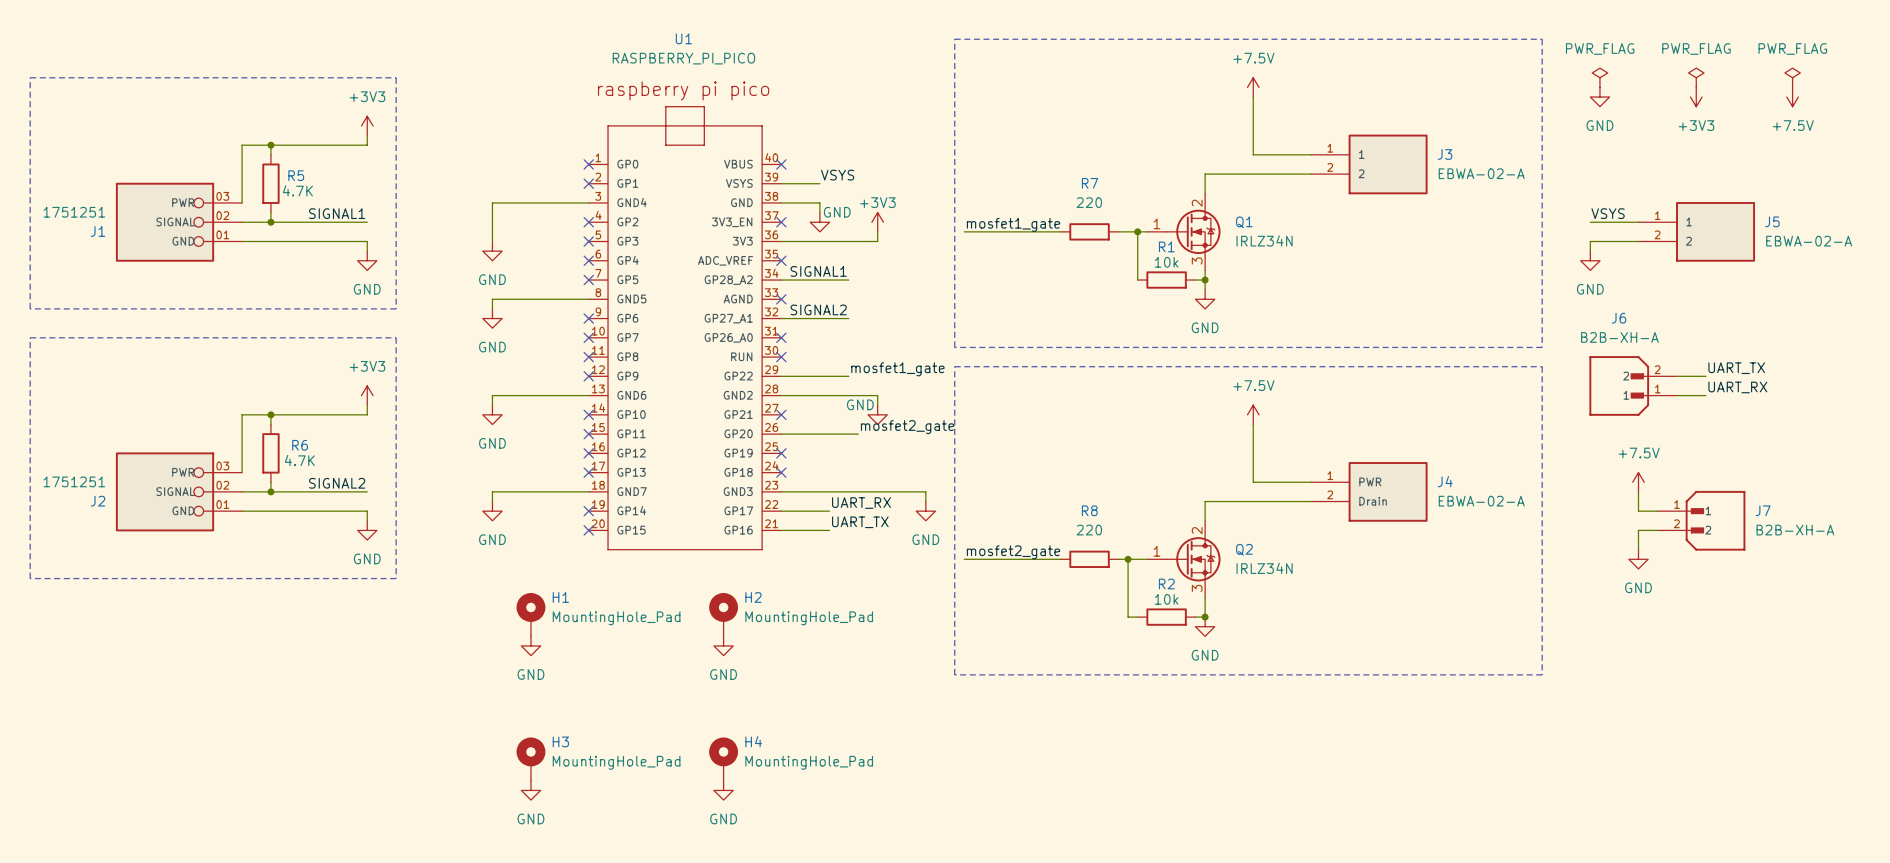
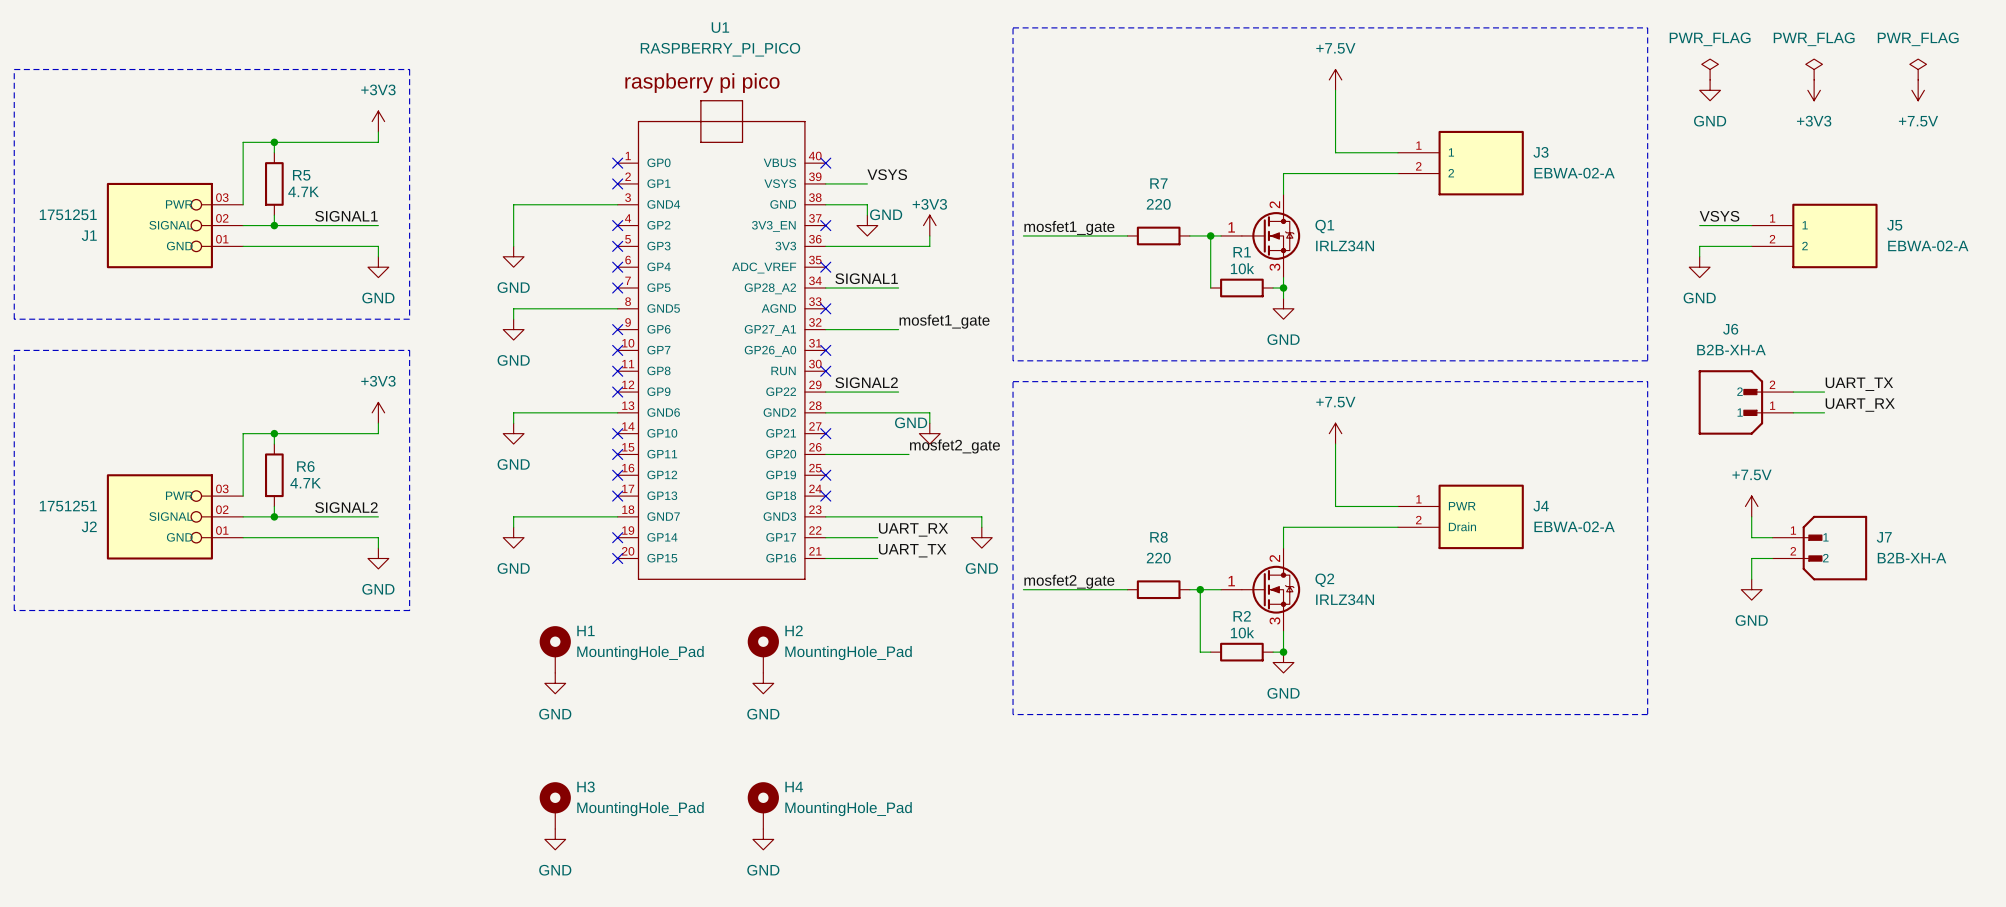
label: SIGNAL2 (818, 309) -> mosfet1_gate (944, 321)
label: mosfet1_gate (897, 369) -> SIGNAL2 (866, 382)

